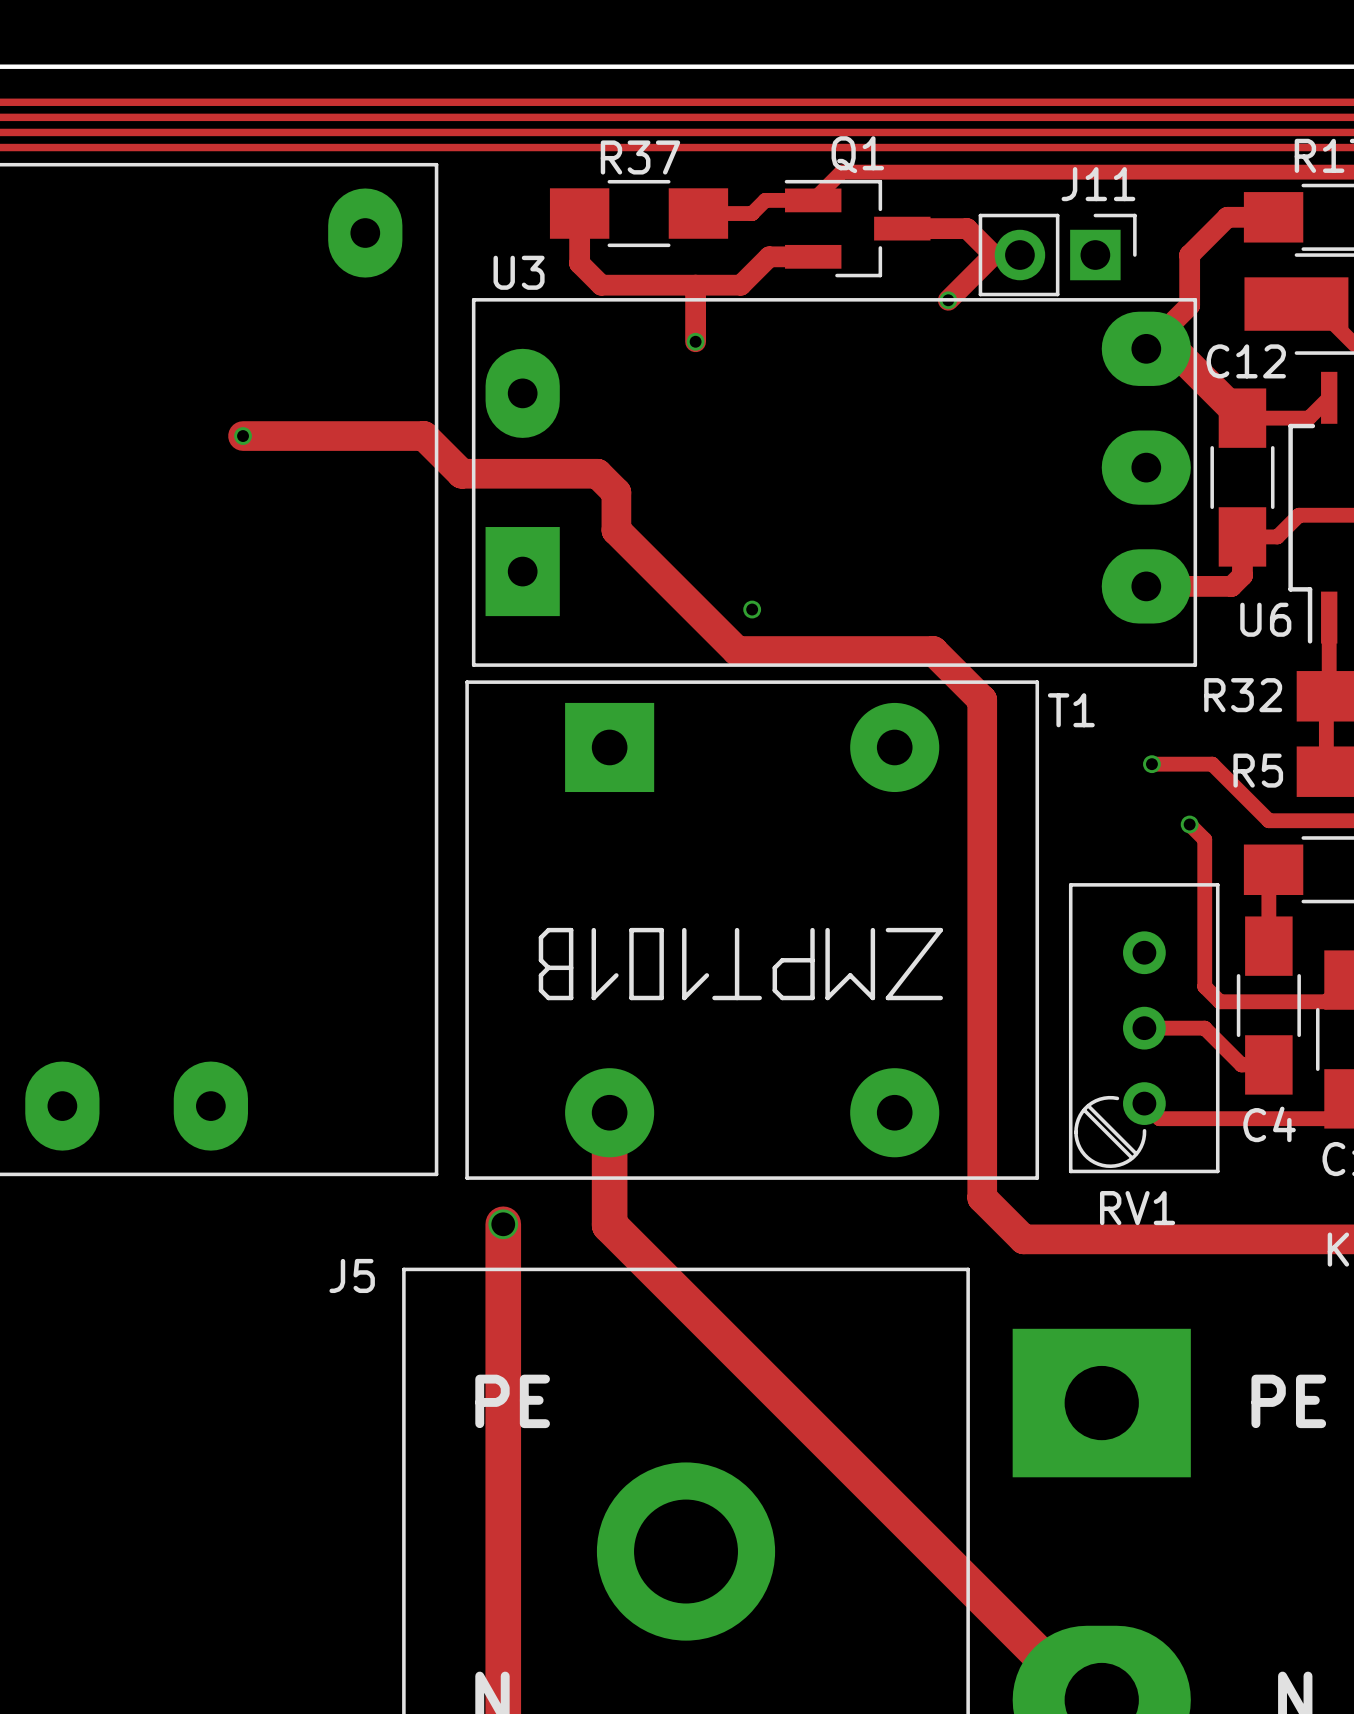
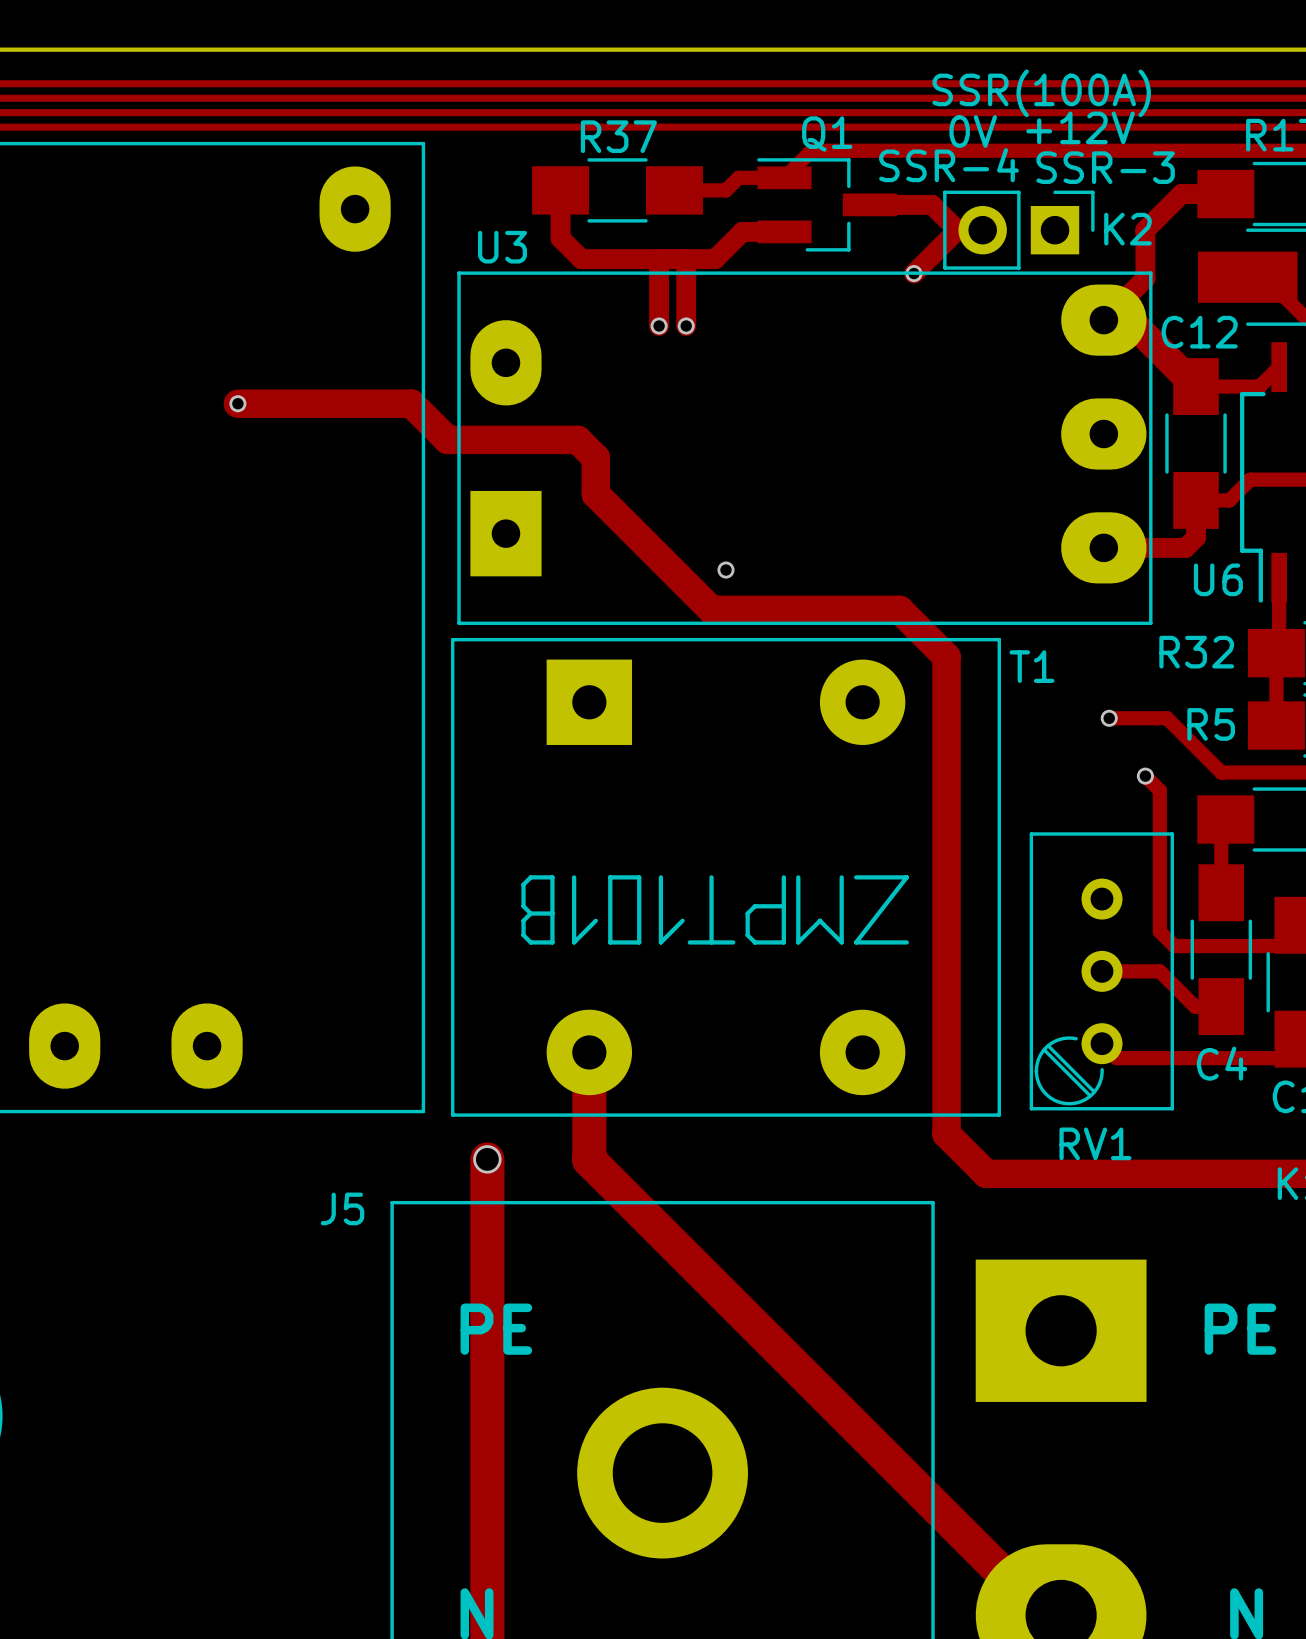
text: none -> SSR(100A) (1041, 93)
text: none -> +12V (1080, 127)
text: none -> 0V (973, 131)
J11 name: J11 (1098, 184) -> K2 (1127, 229)
text: none -> SSR-4 (949, 165)
text: none -> SSR-3 (1105, 167)
track: none -> (659, 259) (659, 325)
track: (695, 285) (695, 341) -> none
track: none -> (684, 259) (686, 260) (686, 325)
via: (695, 341) -> none
via: none -> (659, 325)
via: none -> (686, 325)

